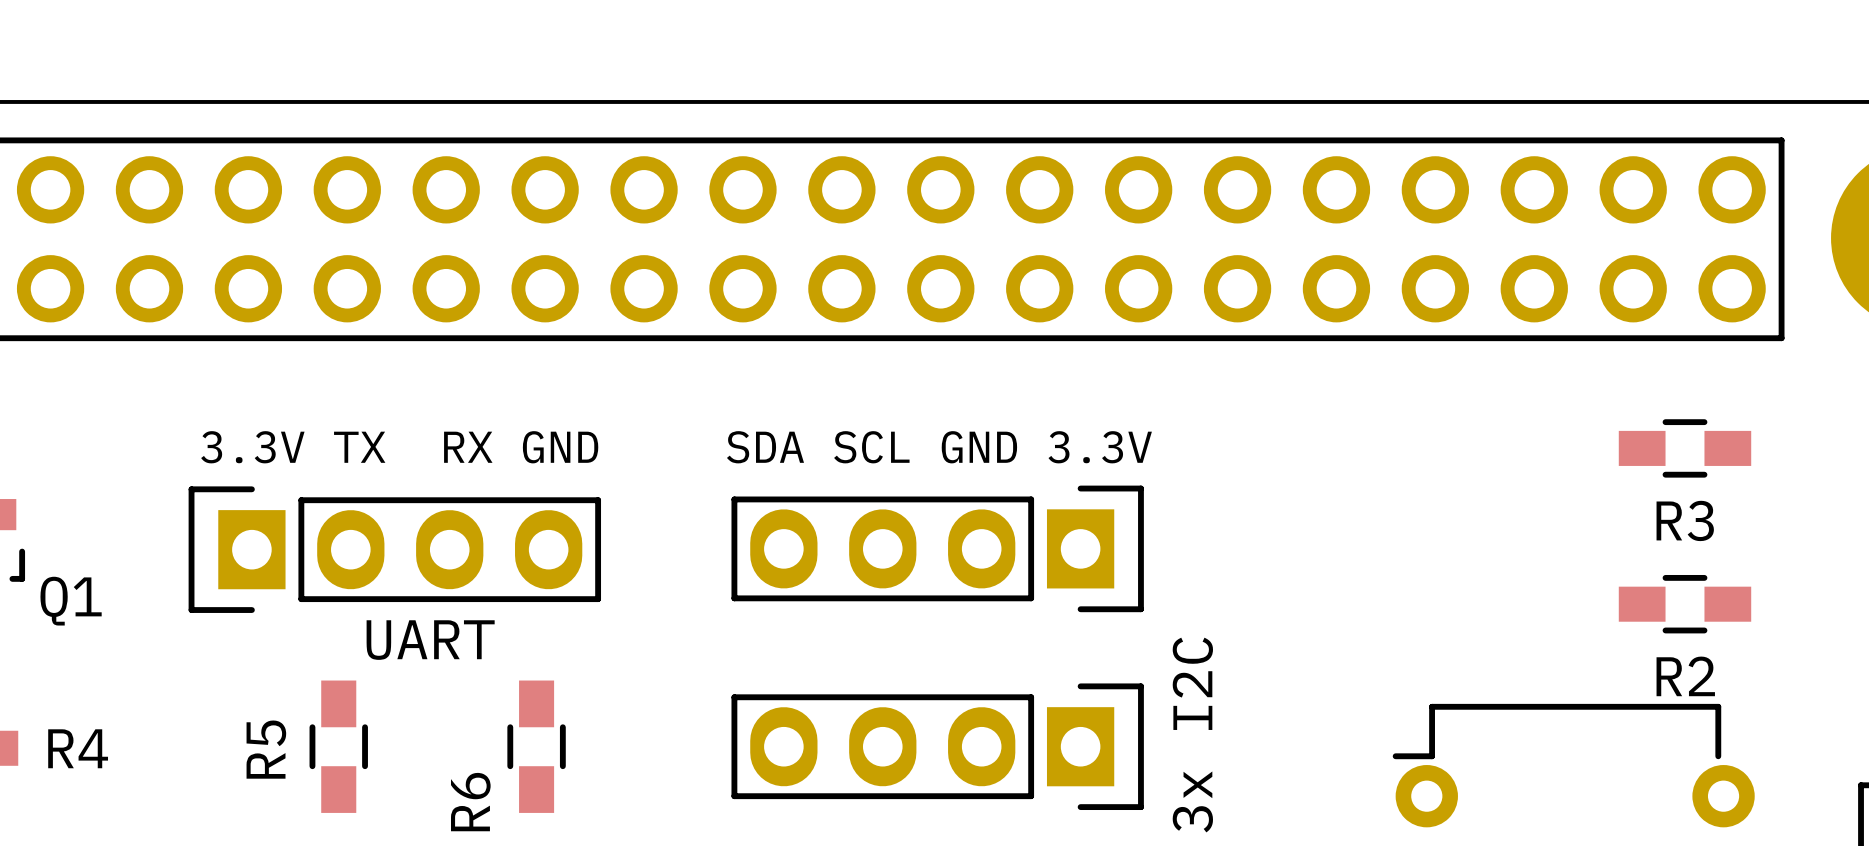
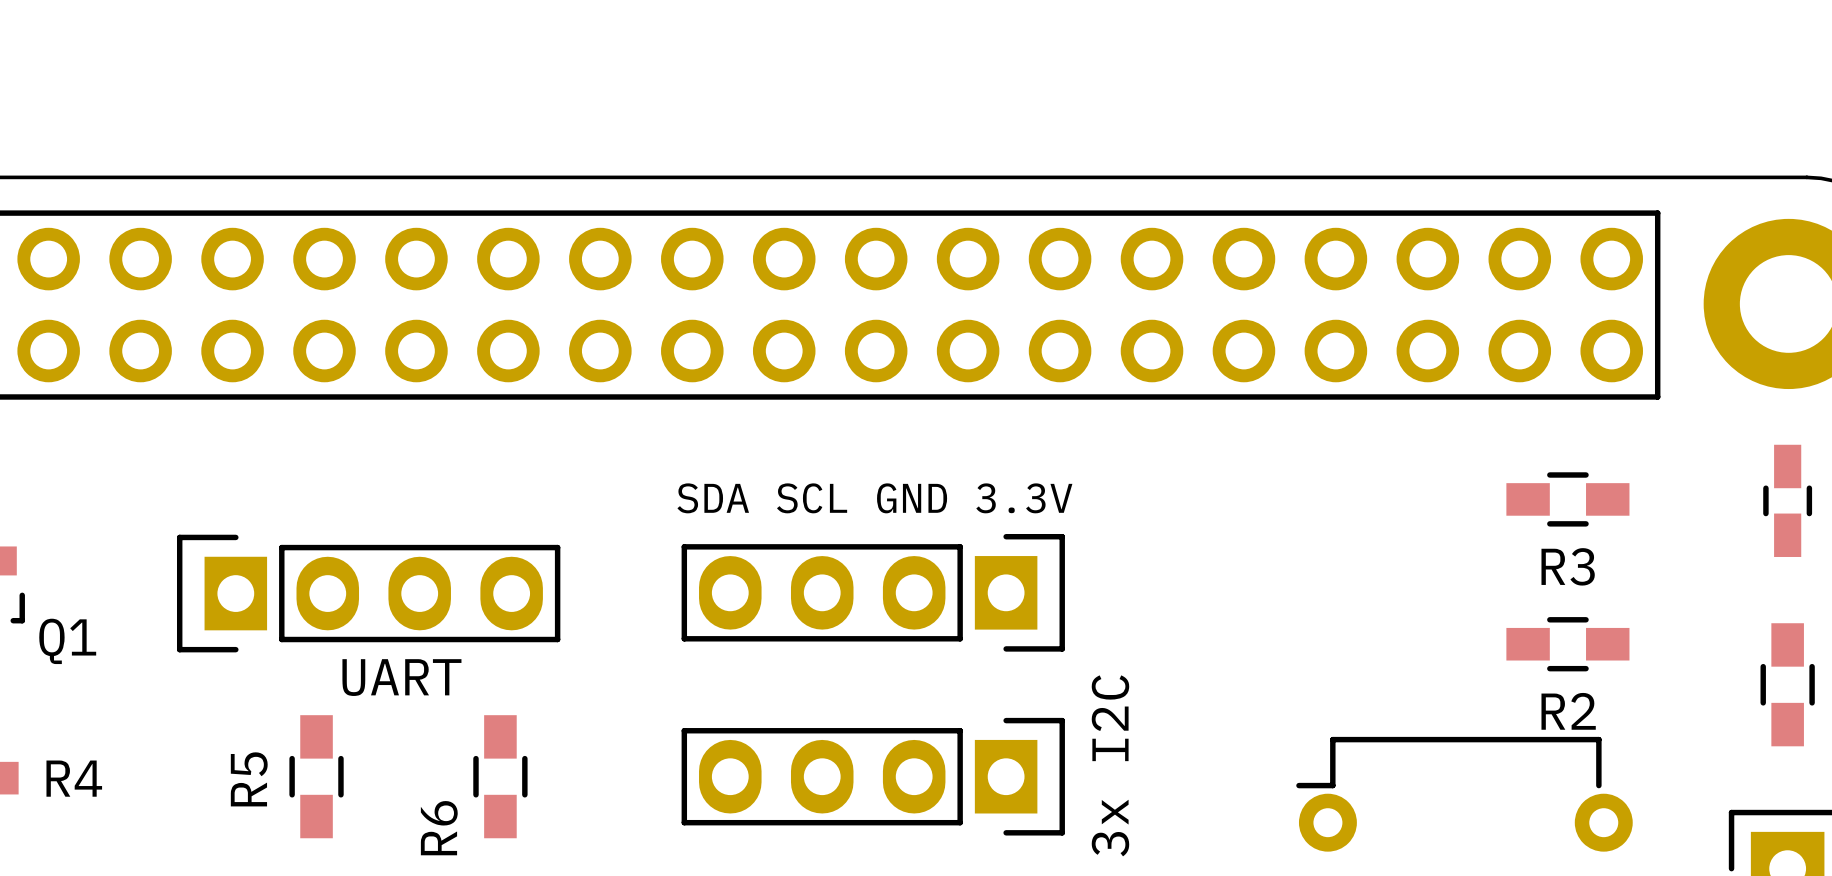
text: 3.3V TX RX GND (399, 447) -> none

